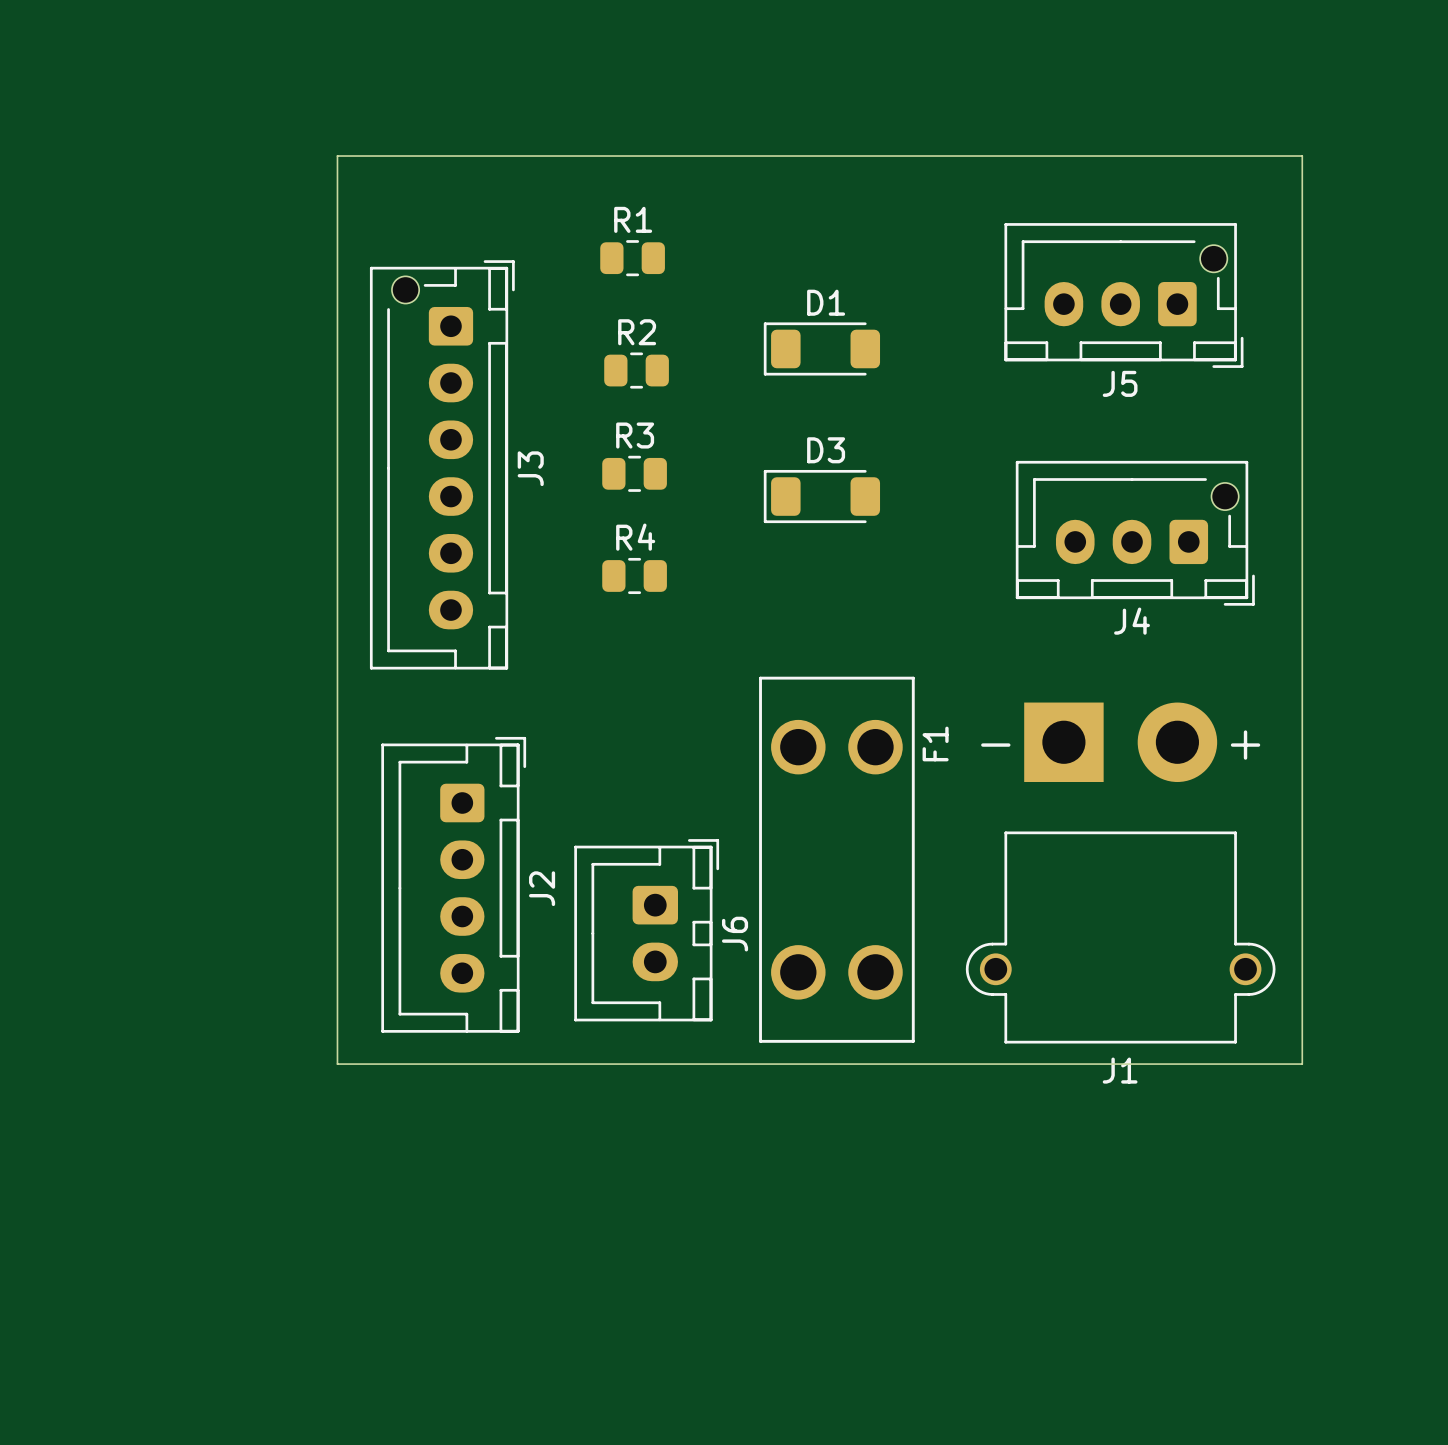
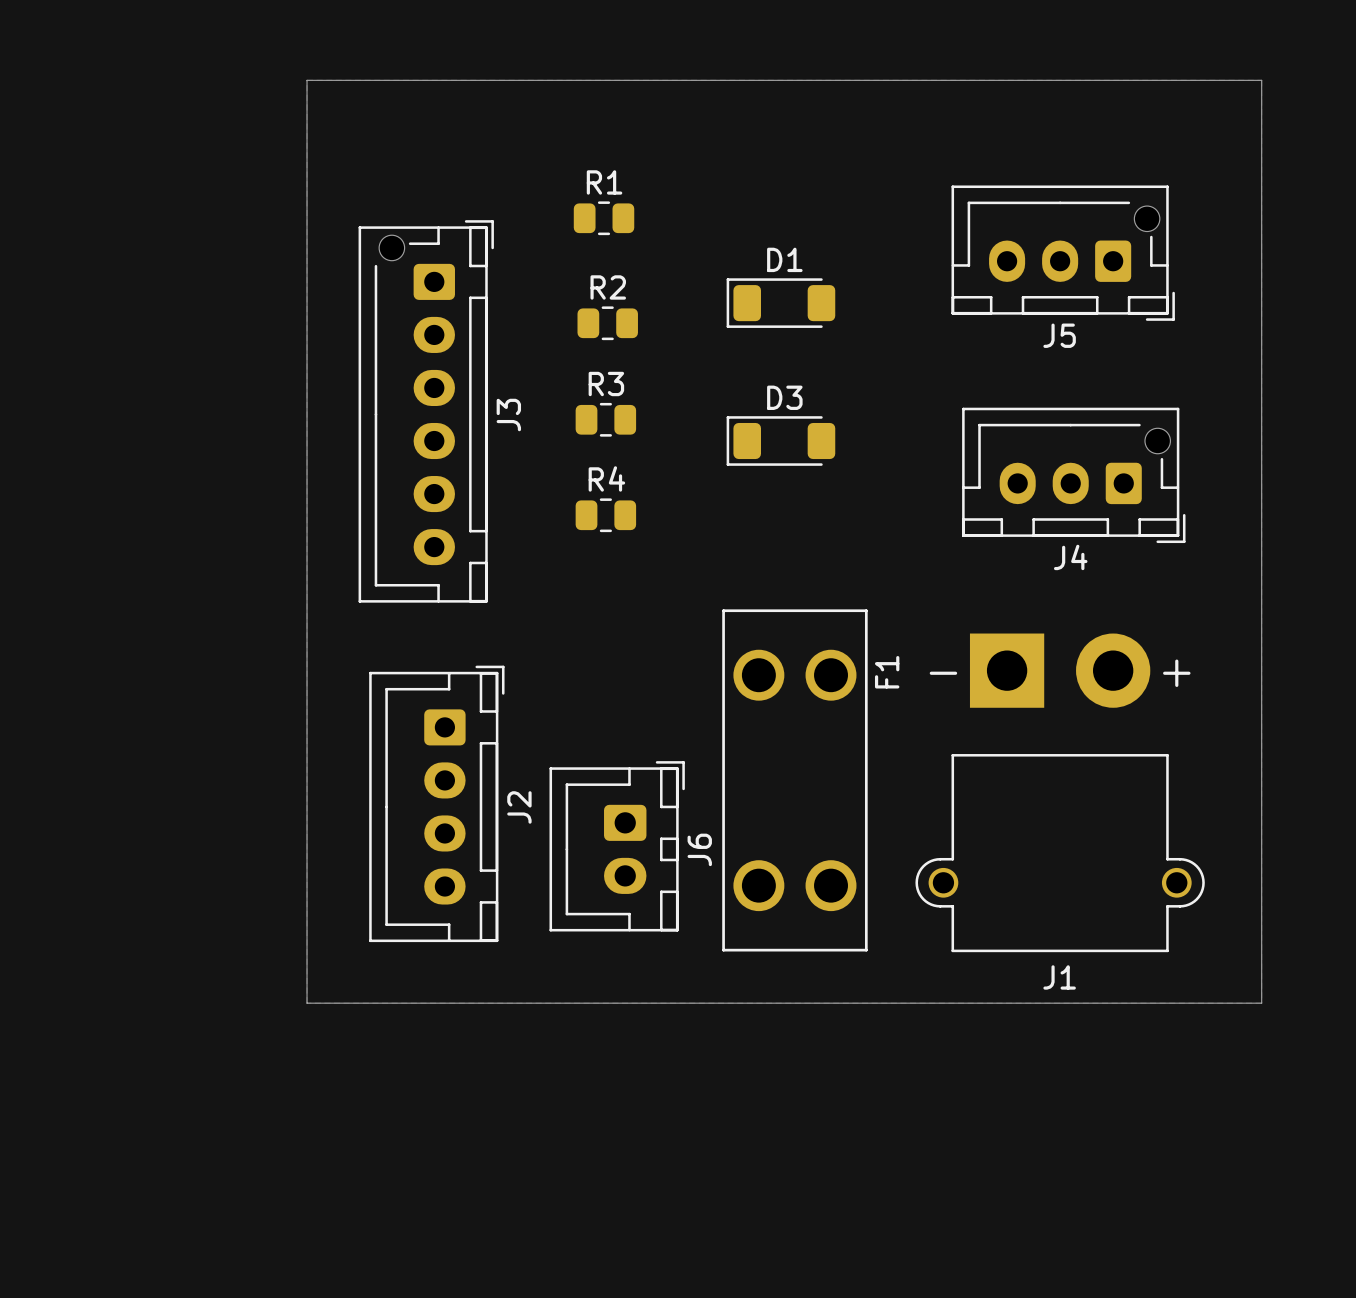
board edge: (337, 156) (1302, 156) (1302, 1064) (337, 1064) (337, 156) -> (307, 80) (307, 1003) (1261, 1003) (1261, 80) (307, 80)

